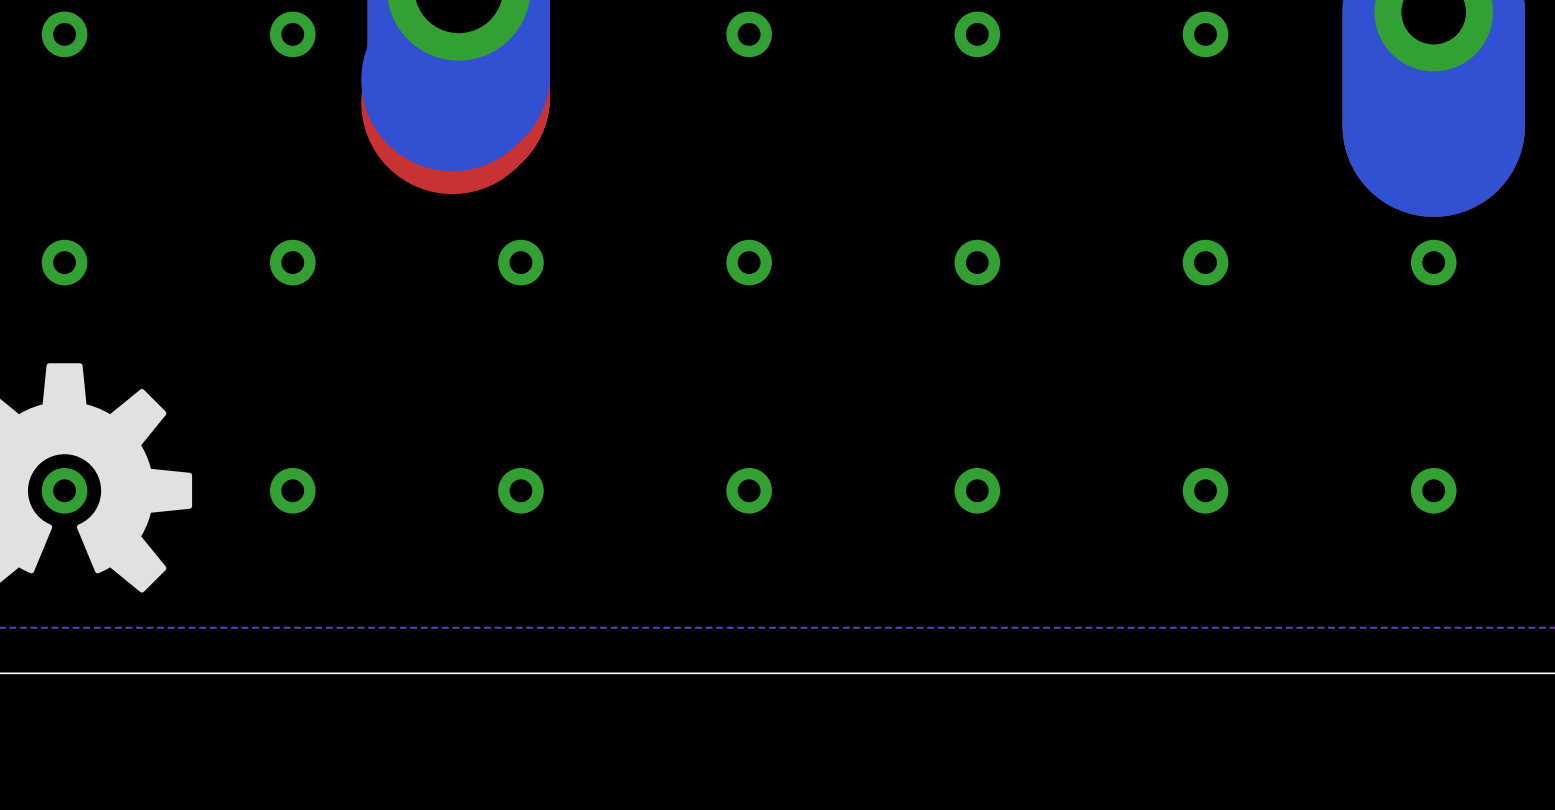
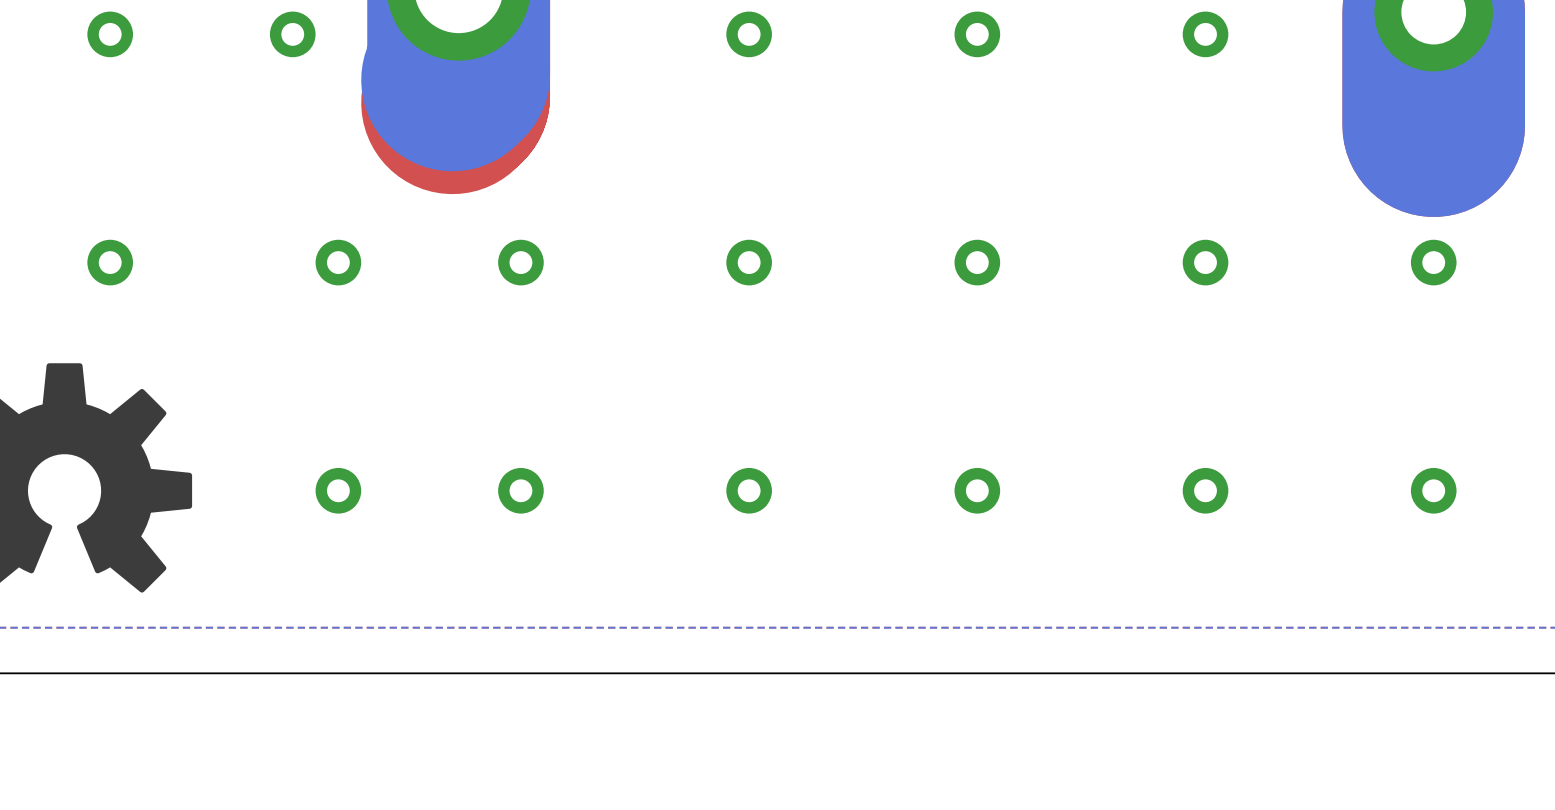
via position: (64, 34) -> (110, 34)
via position: (64, 262) -> (110, 262)
via position: (292, 262) -> (338, 262)
via: (64, 490) -> none
via position: (292, 490) -> (338, 490)

